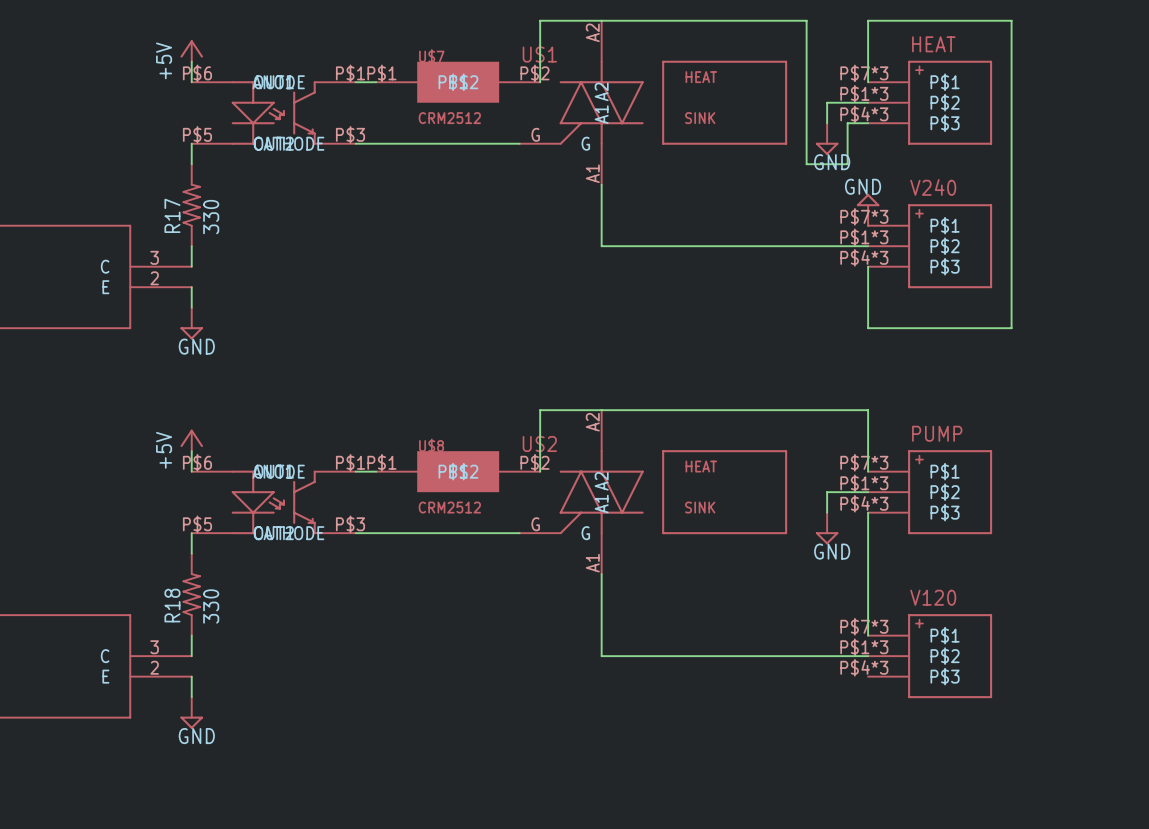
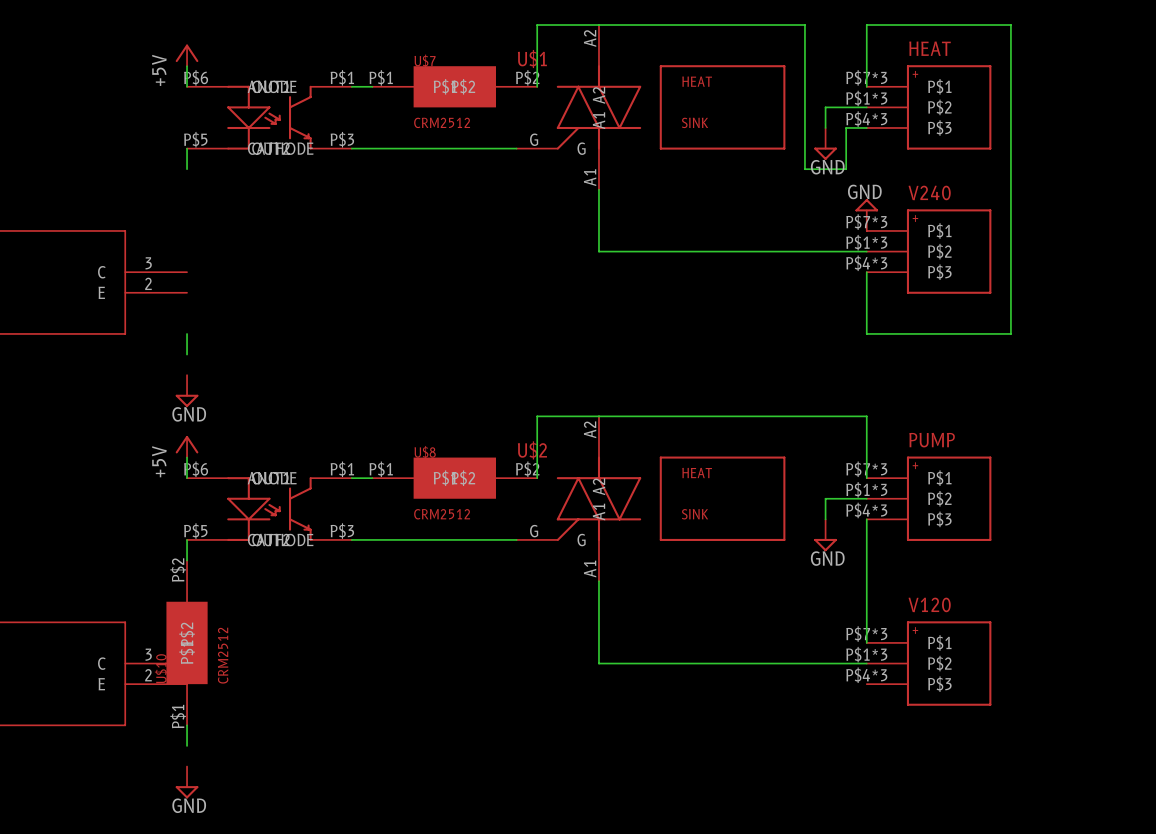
R17: 330 (191, 205) -> none
wire: (191, 246) (191, 266) -> (187, 333) (187, 354)
wire: (191, 287) (191, 307) -> none
power symbol position: GND (191, 323) -> GND (187, 391)
R18: 330 (191, 594) -> none
U$10: none -> CRM2512 (187, 642)
power symbol position: GND (191, 713) -> GND (187, 782)

